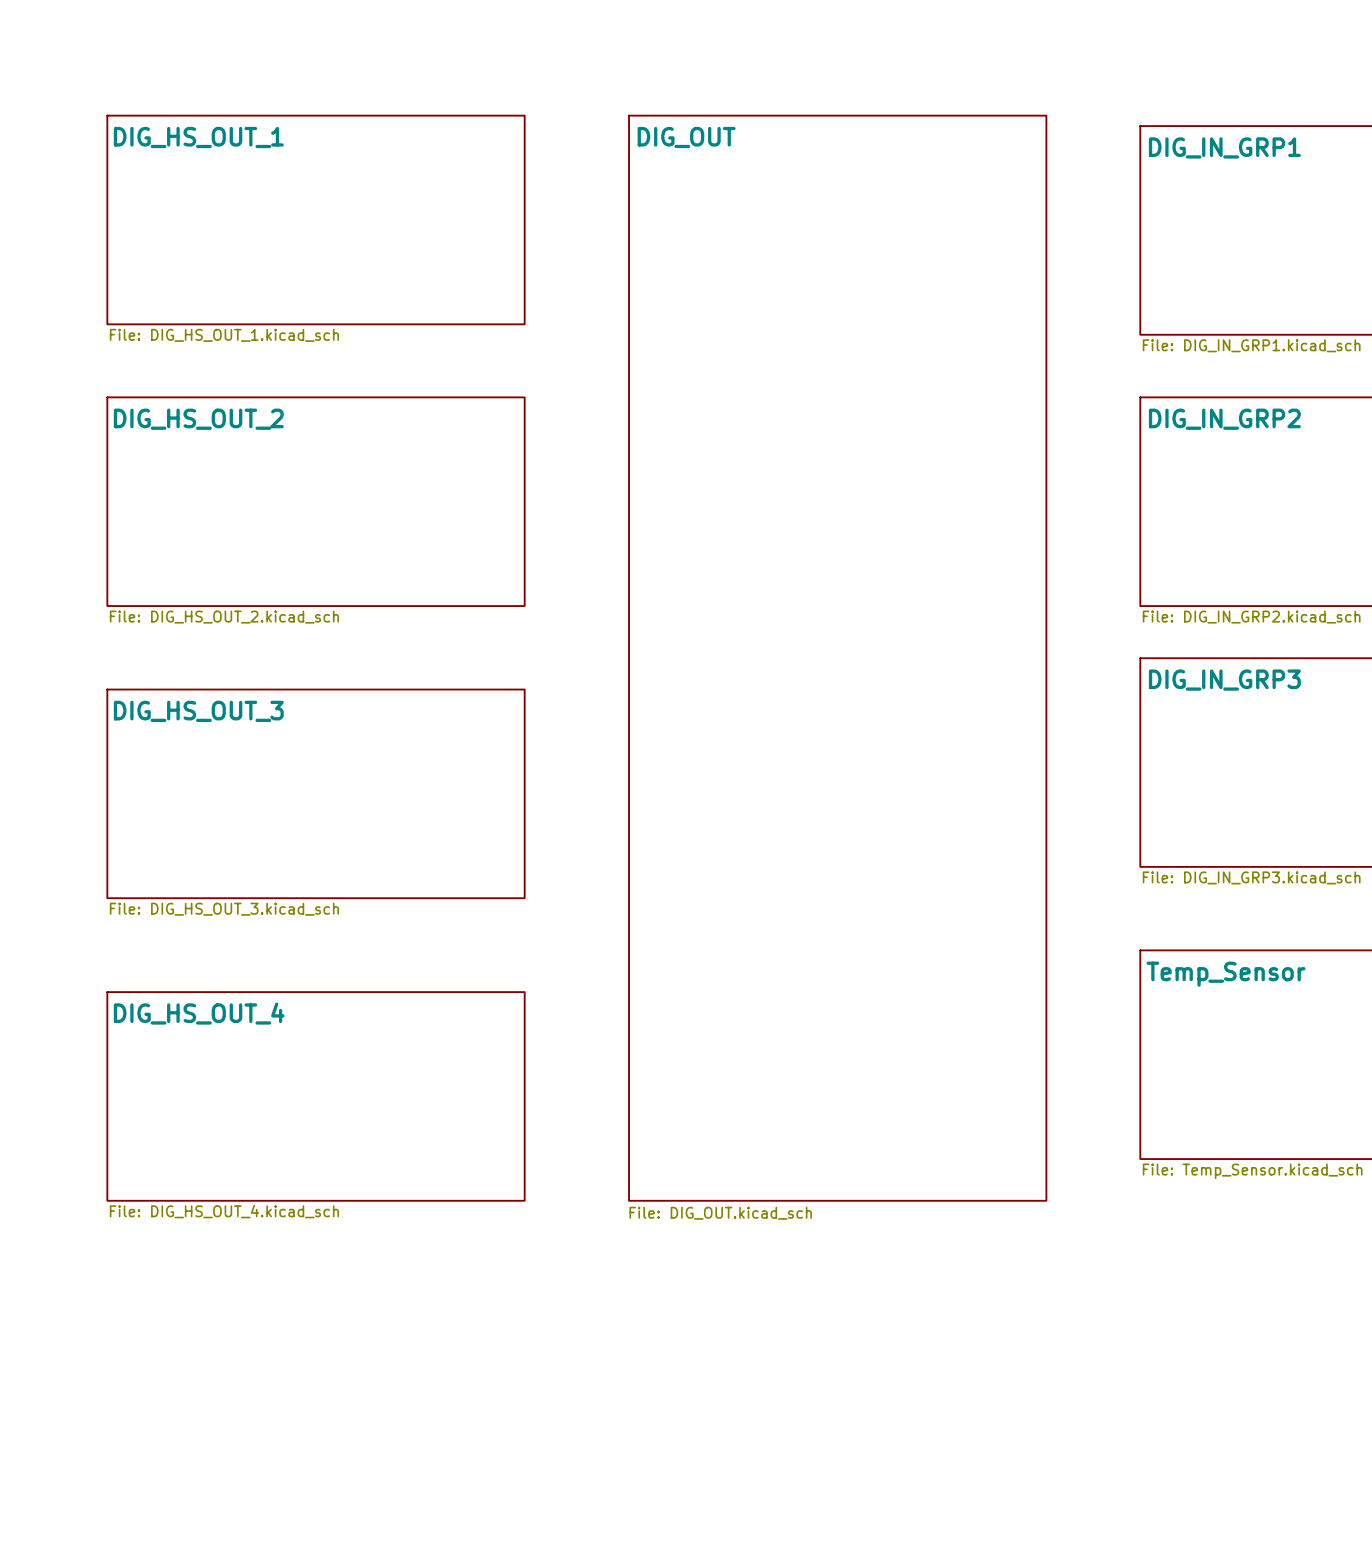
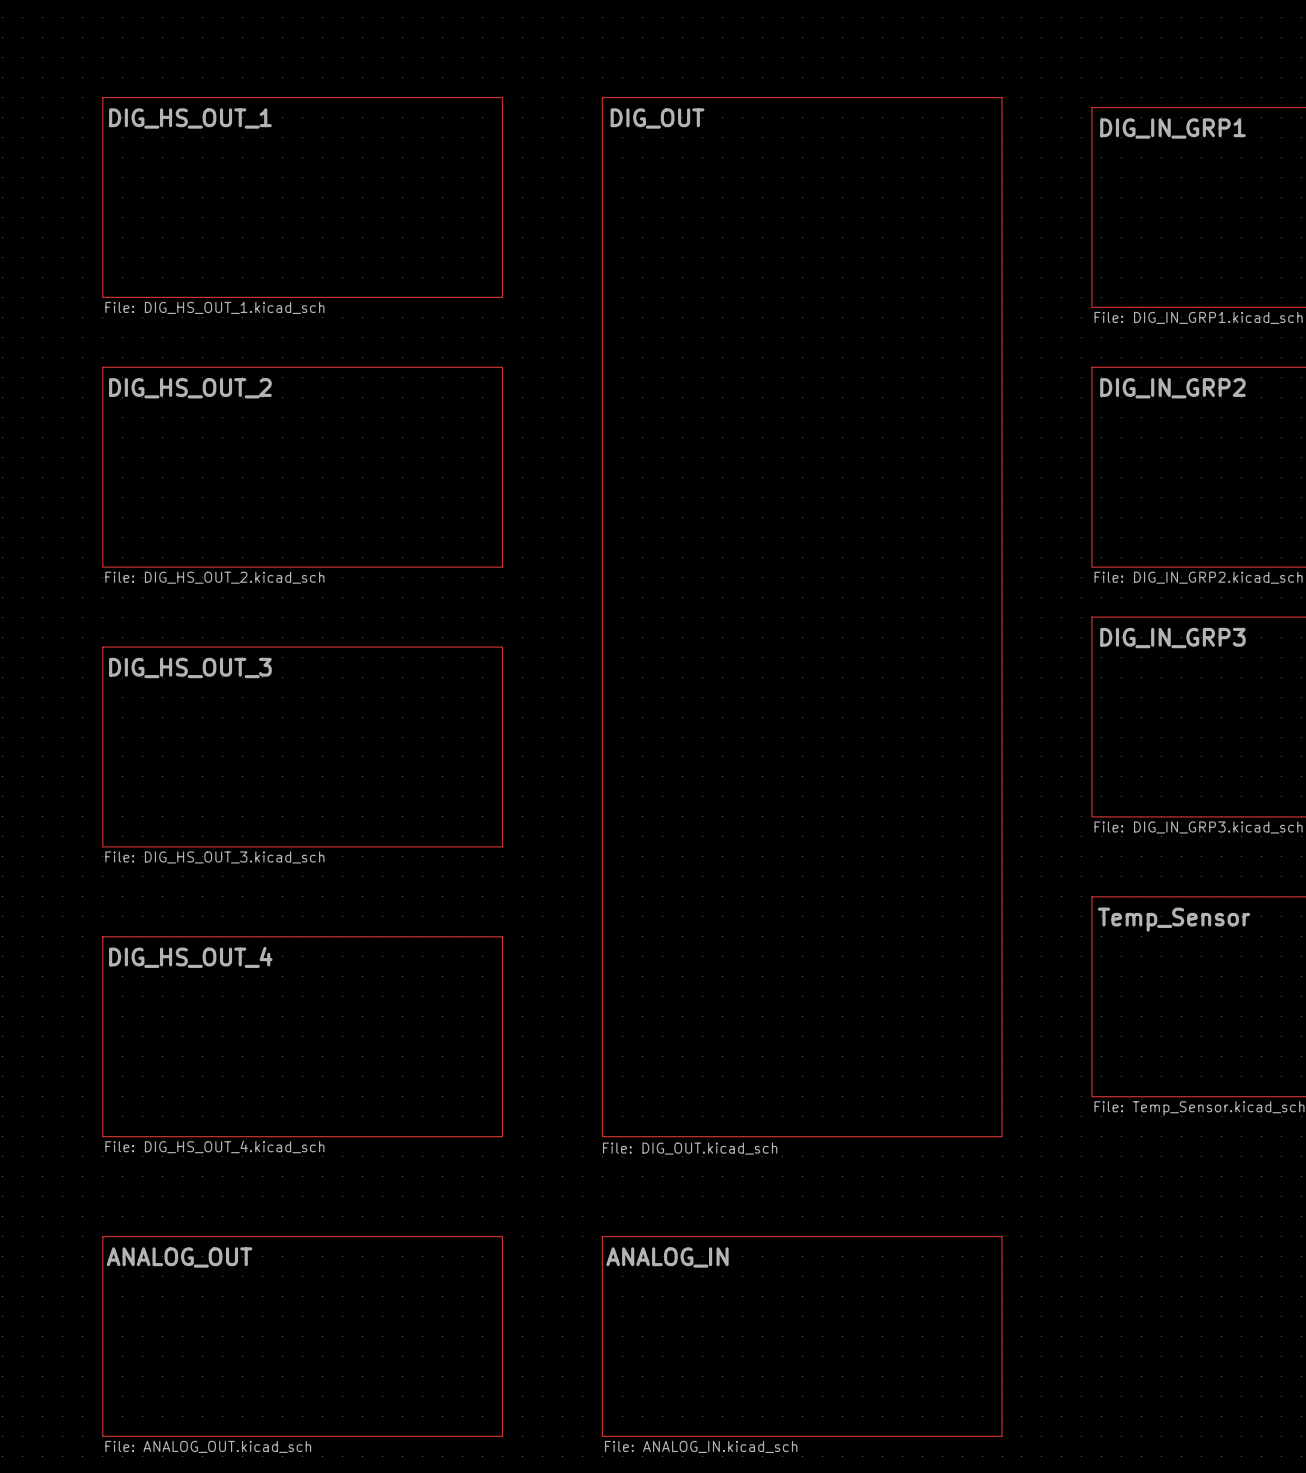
sheet ANALOG_OUT: none -> File: ANALOG_OUT.kicad_sch (302, 1336)
sheet ANALOG_IN: none -> File: ANALOG_IN.kicad_sch (802, 1336)

